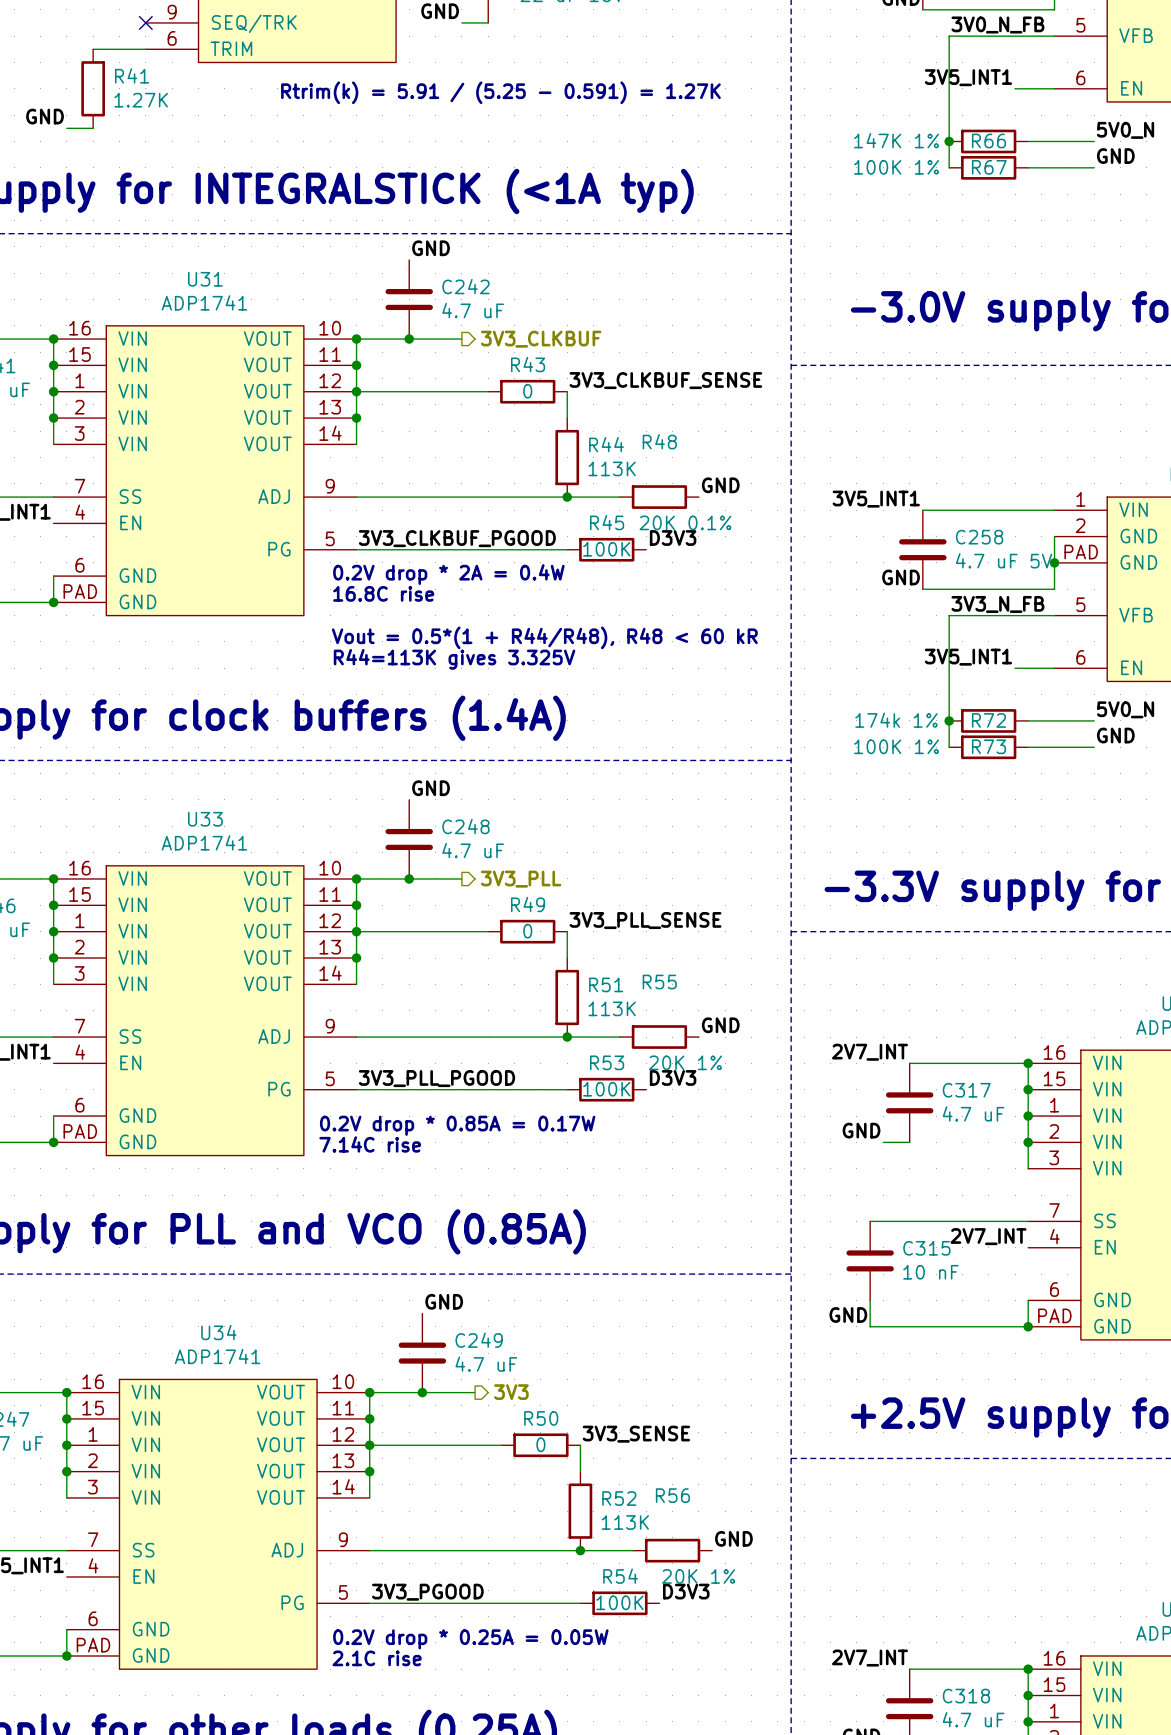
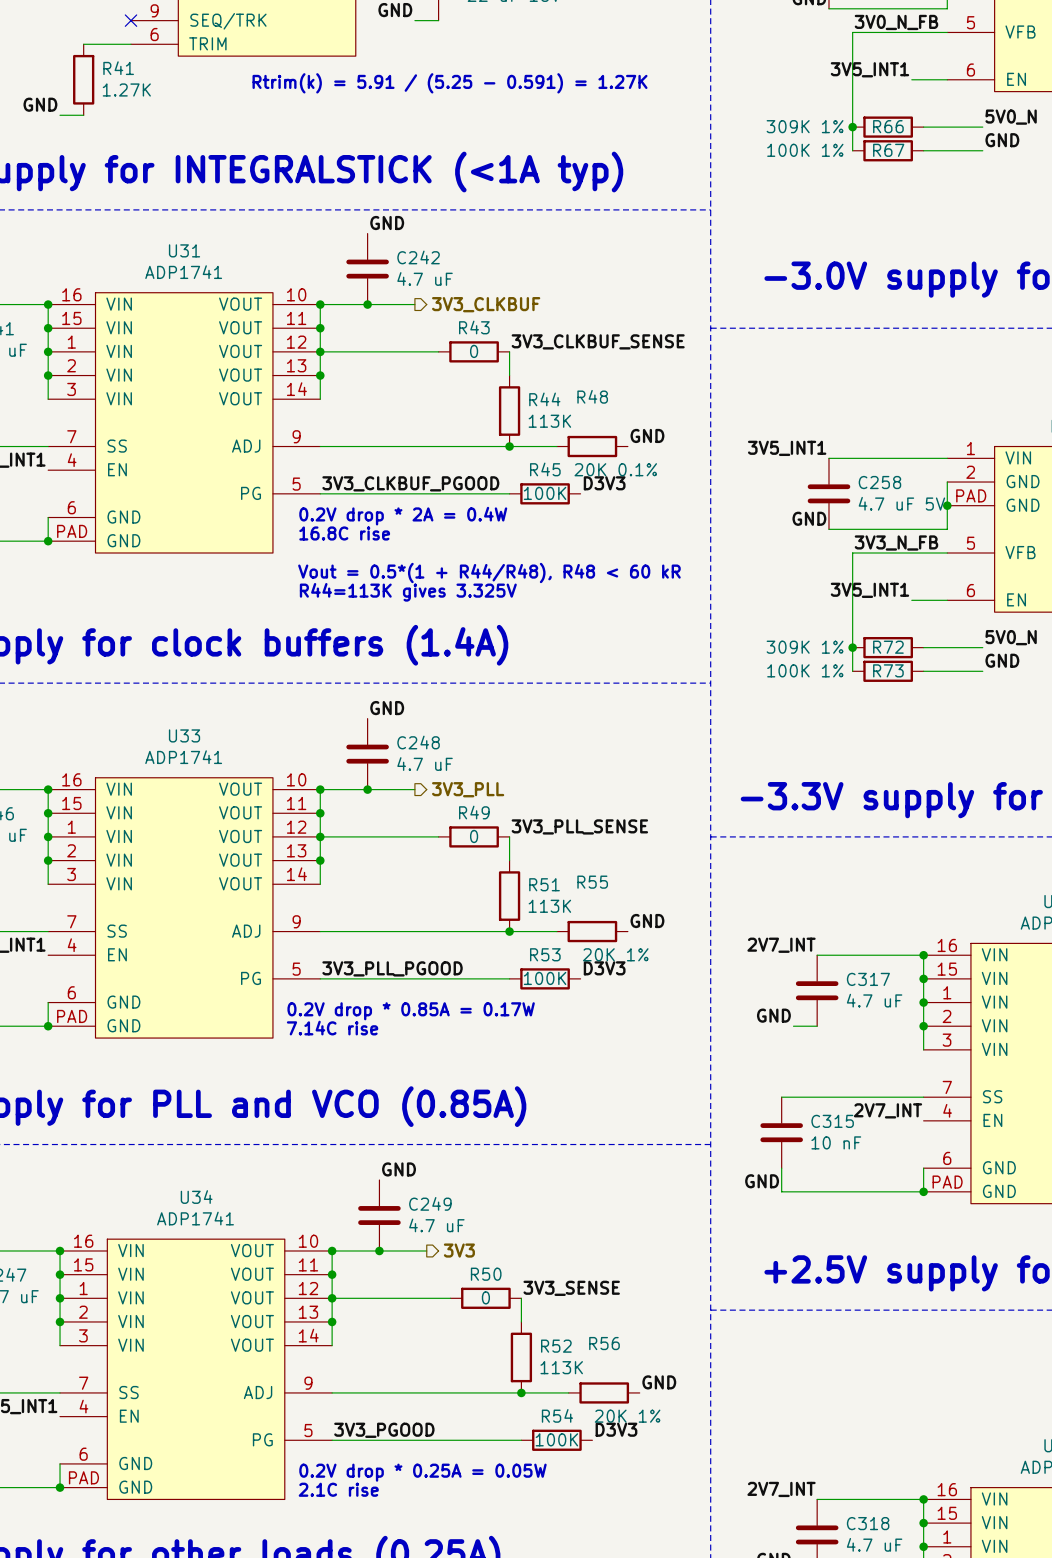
R66 value: 147K 1% (896, 140) -> 309K 1% (805, 126)
R72 value: 174k 1% (896, 720) -> 309K 1% (805, 647)

